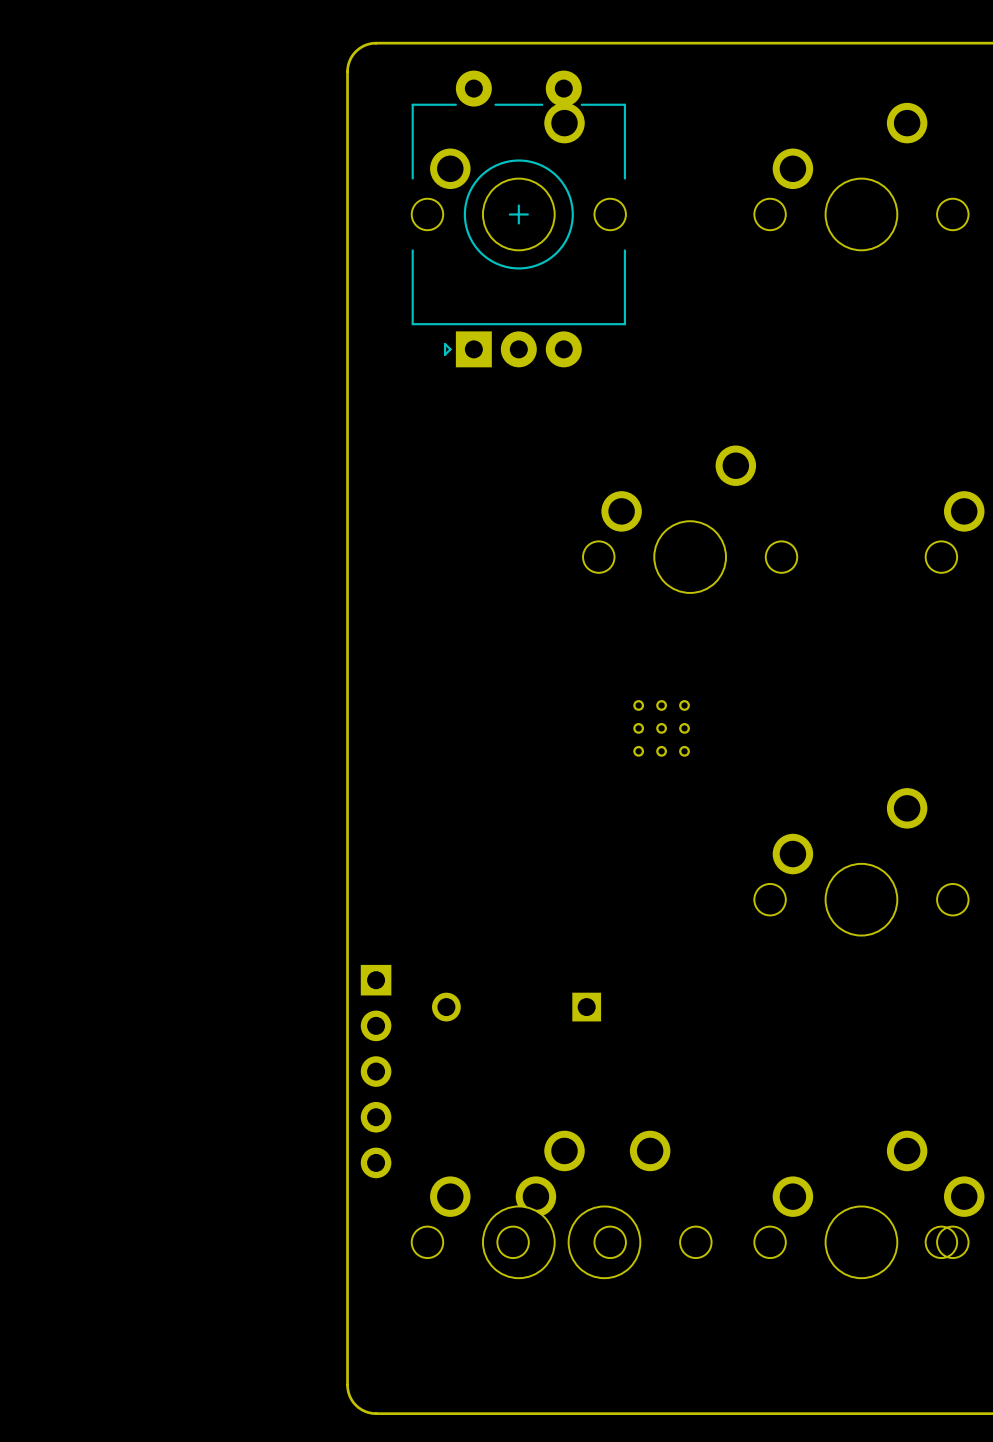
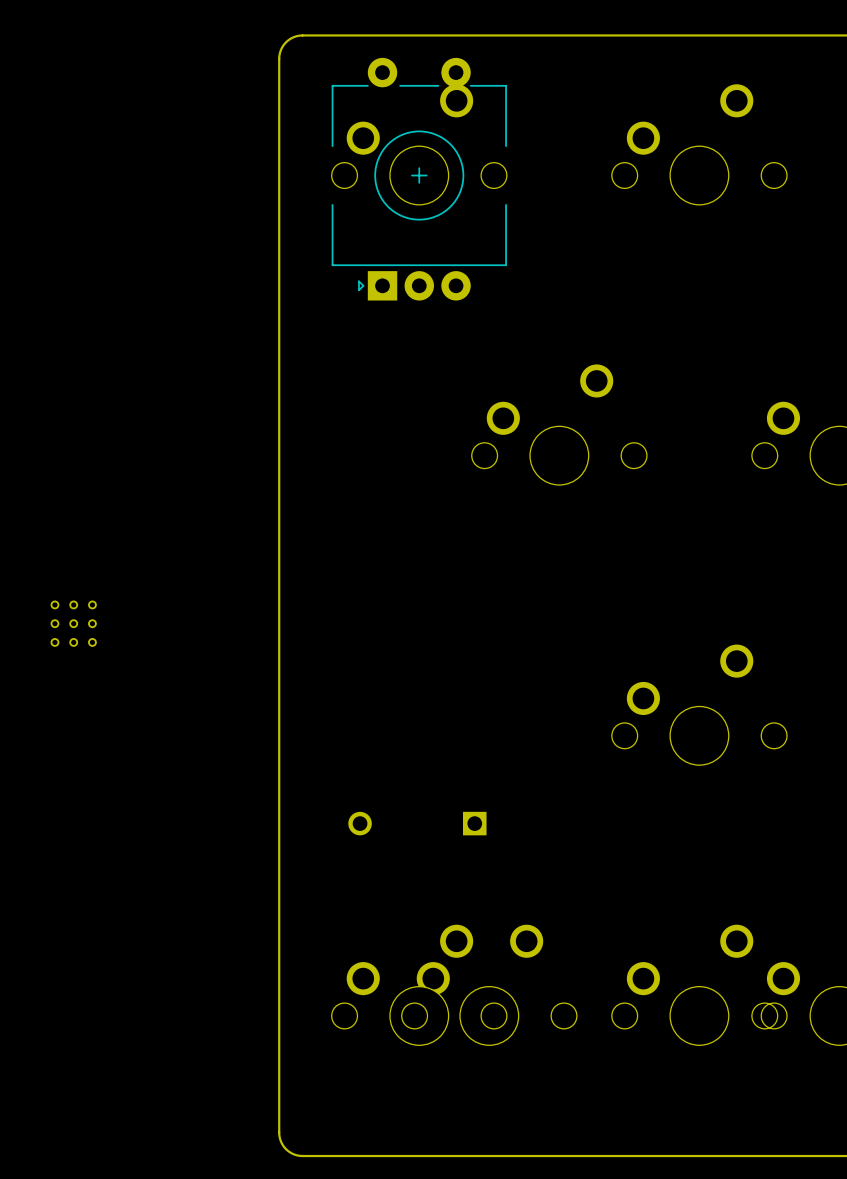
part: (661, 728) -> none
part: none -> (73, 623)
part: (376, 1071) -> none

